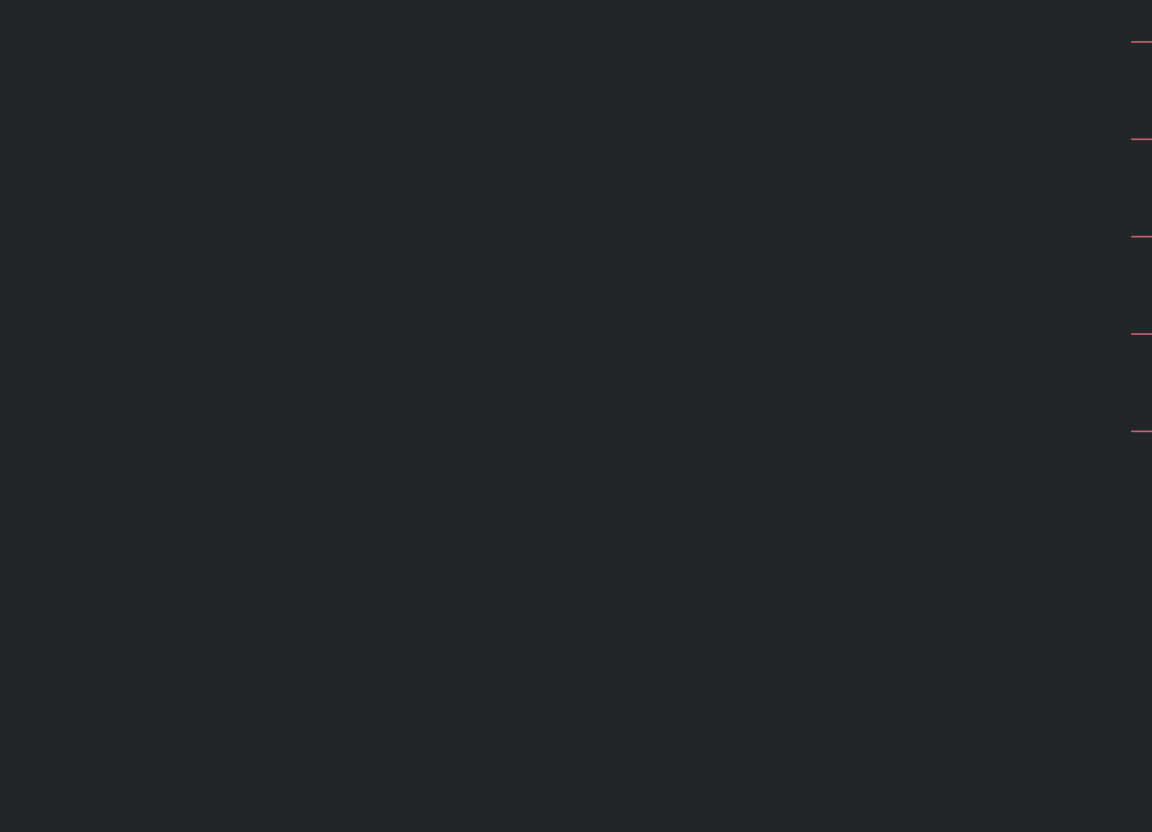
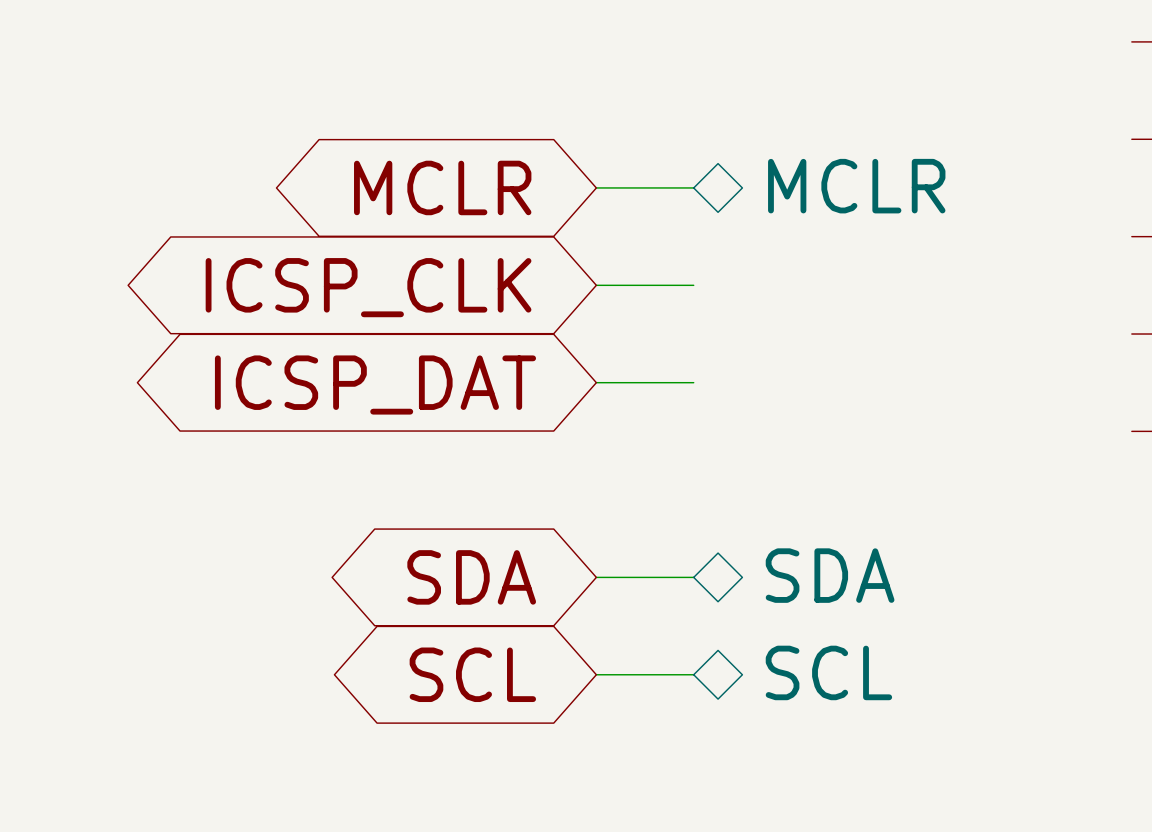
sheet pin: none -> MCLR (856, 186)
global label: none -> MCLR (442, 187)
wire: none -> (596, 187) (693, 187)
wire: none -> (596, 285) (693, 285)
global label: none -> ICSP_CLK (368, 287)
wire: none -> (596, 382) (693, 382)
global label: none -> ICSP_DAT (375, 385)
sheet pin: none -> SDA (830, 575)
global label: none -> SDA (471, 577)
wire: none -> (596, 577) (693, 577)
sheet pin: none -> SCL (828, 672)
global label: none -> SCL (472, 674)
wire: none -> (596, 674) (693, 674)

